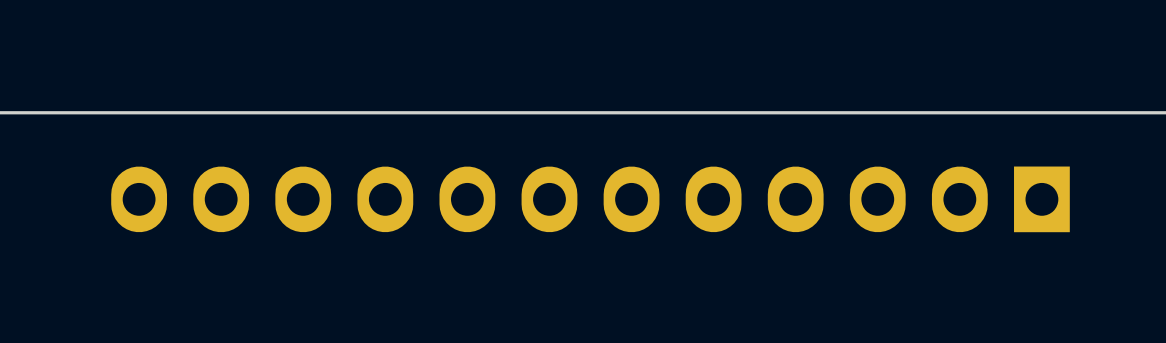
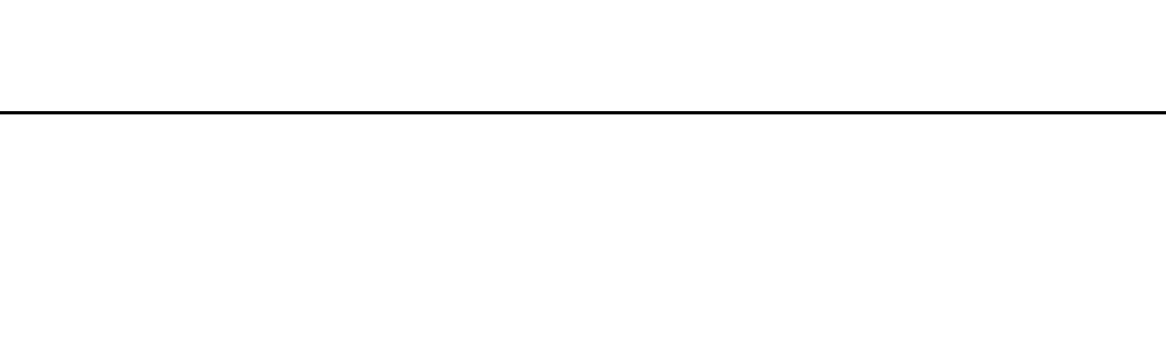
part: (590, 199) -> none

